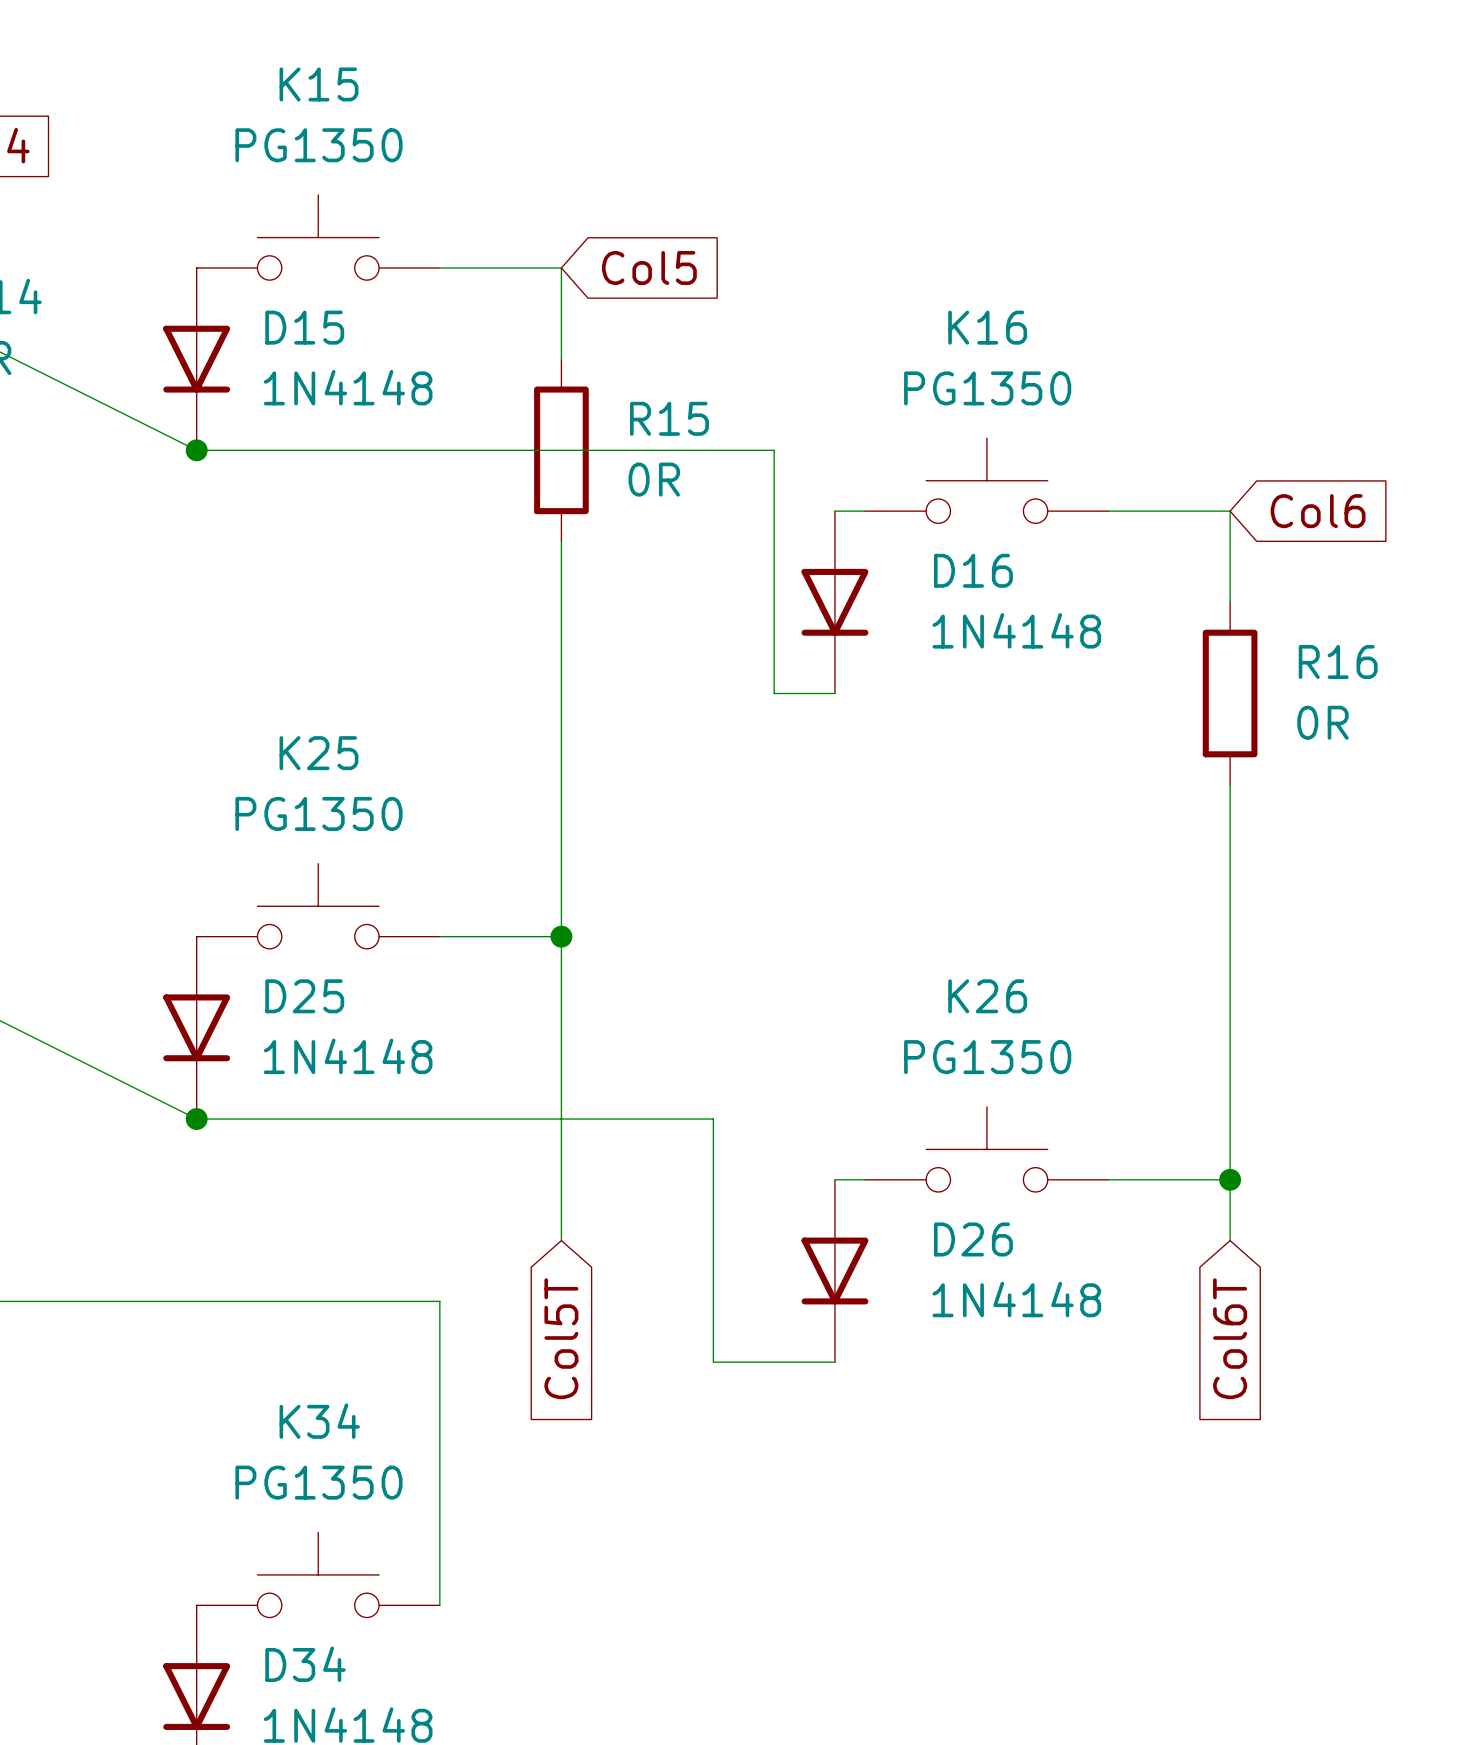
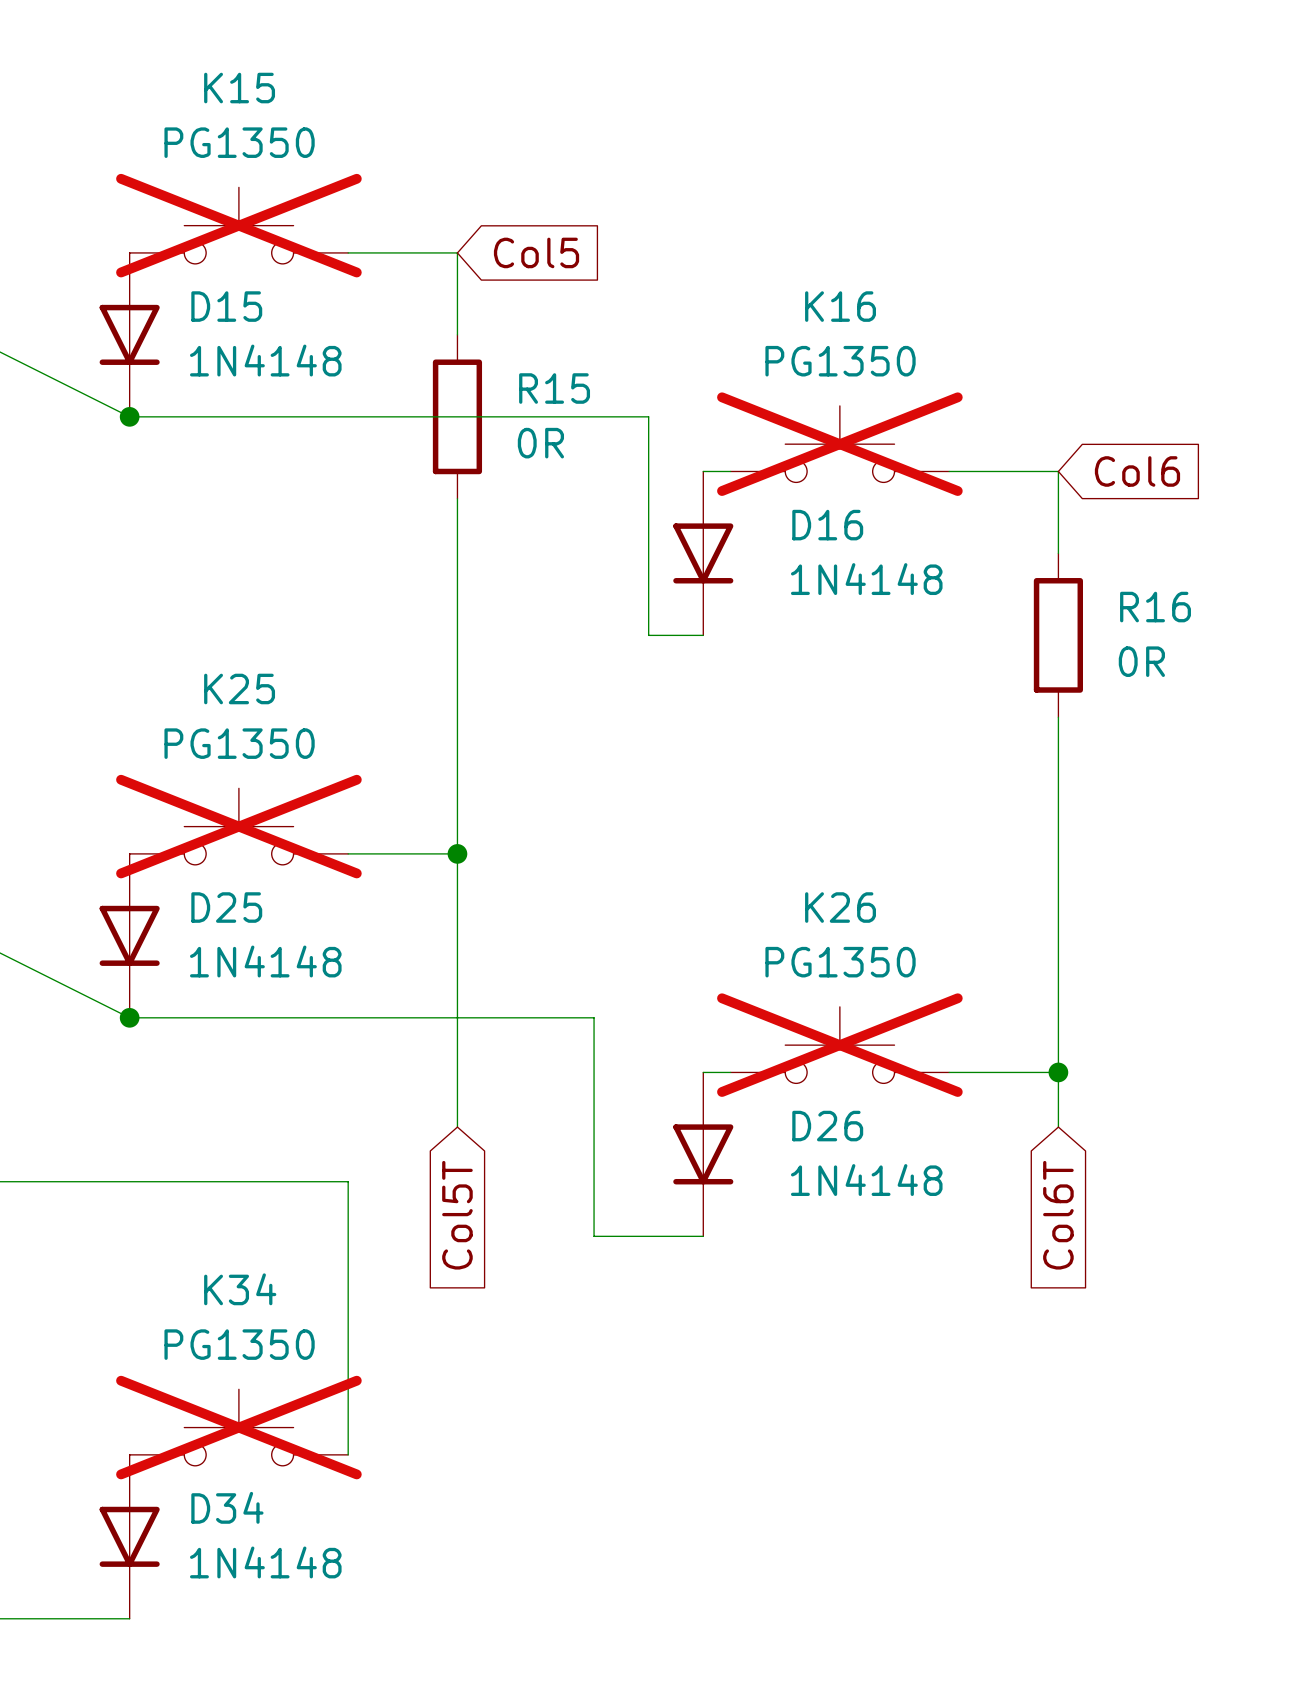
K15 do-not-place cross: none -> (238, 225)
K16 do-not-place cross: none -> (839, 444)
K25 do-not-place cross: none -> (238, 826)
K26 do-not-place cross: none -> (839, 1045)
K34 do-not-place cross: none -> (238, 1427)

